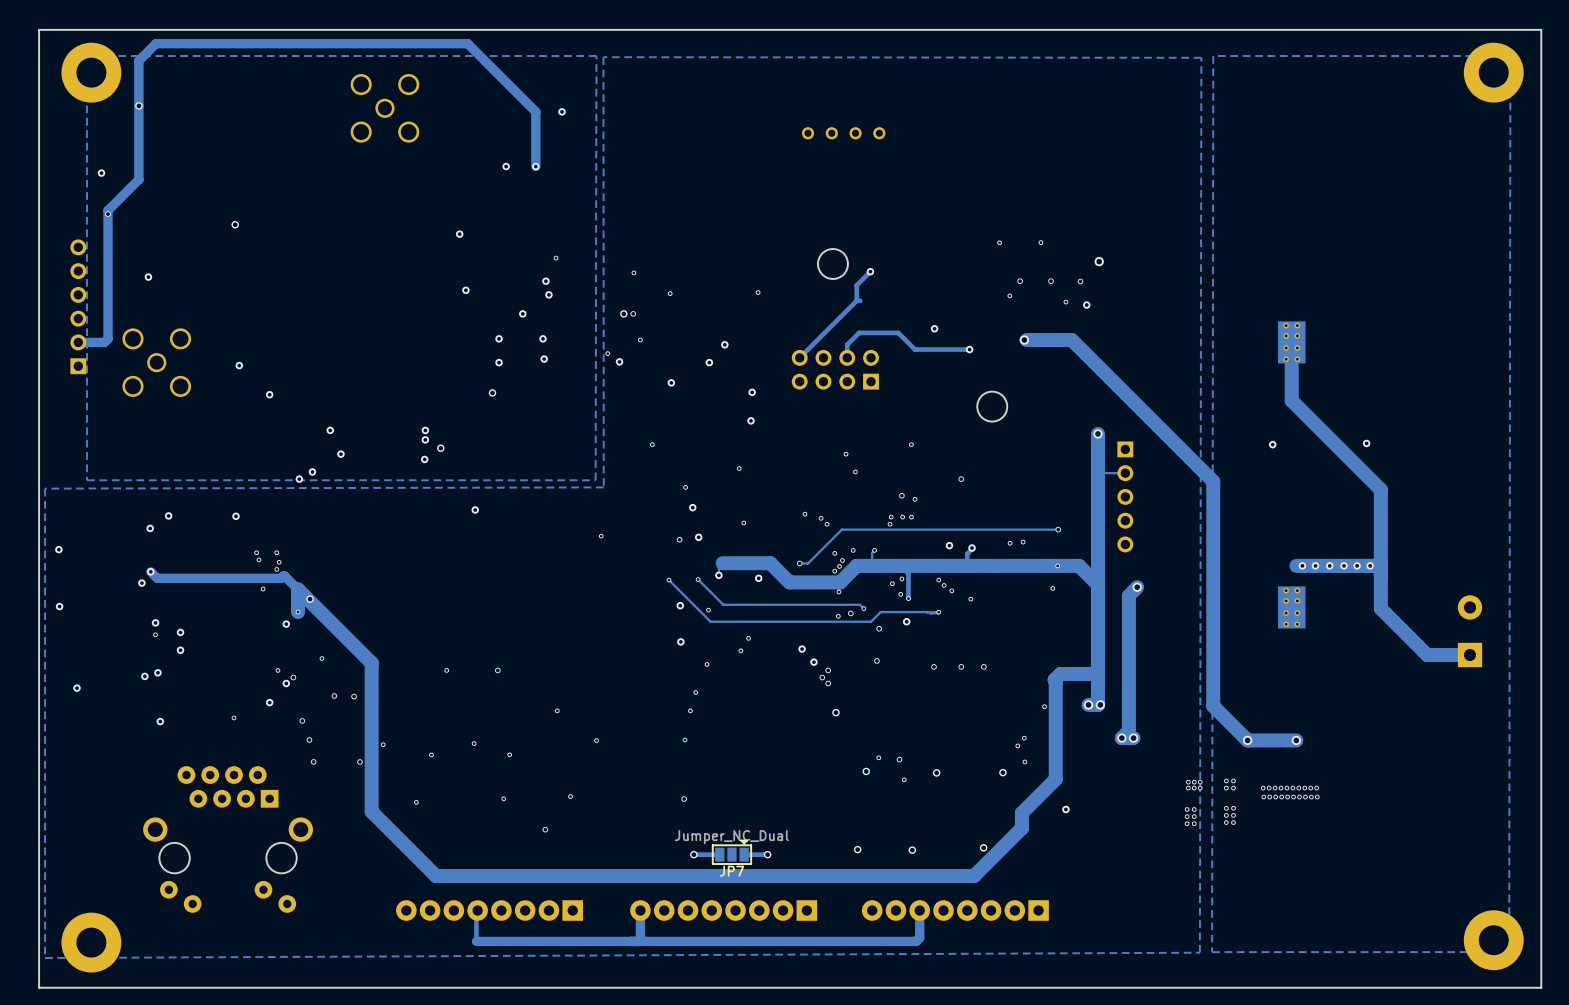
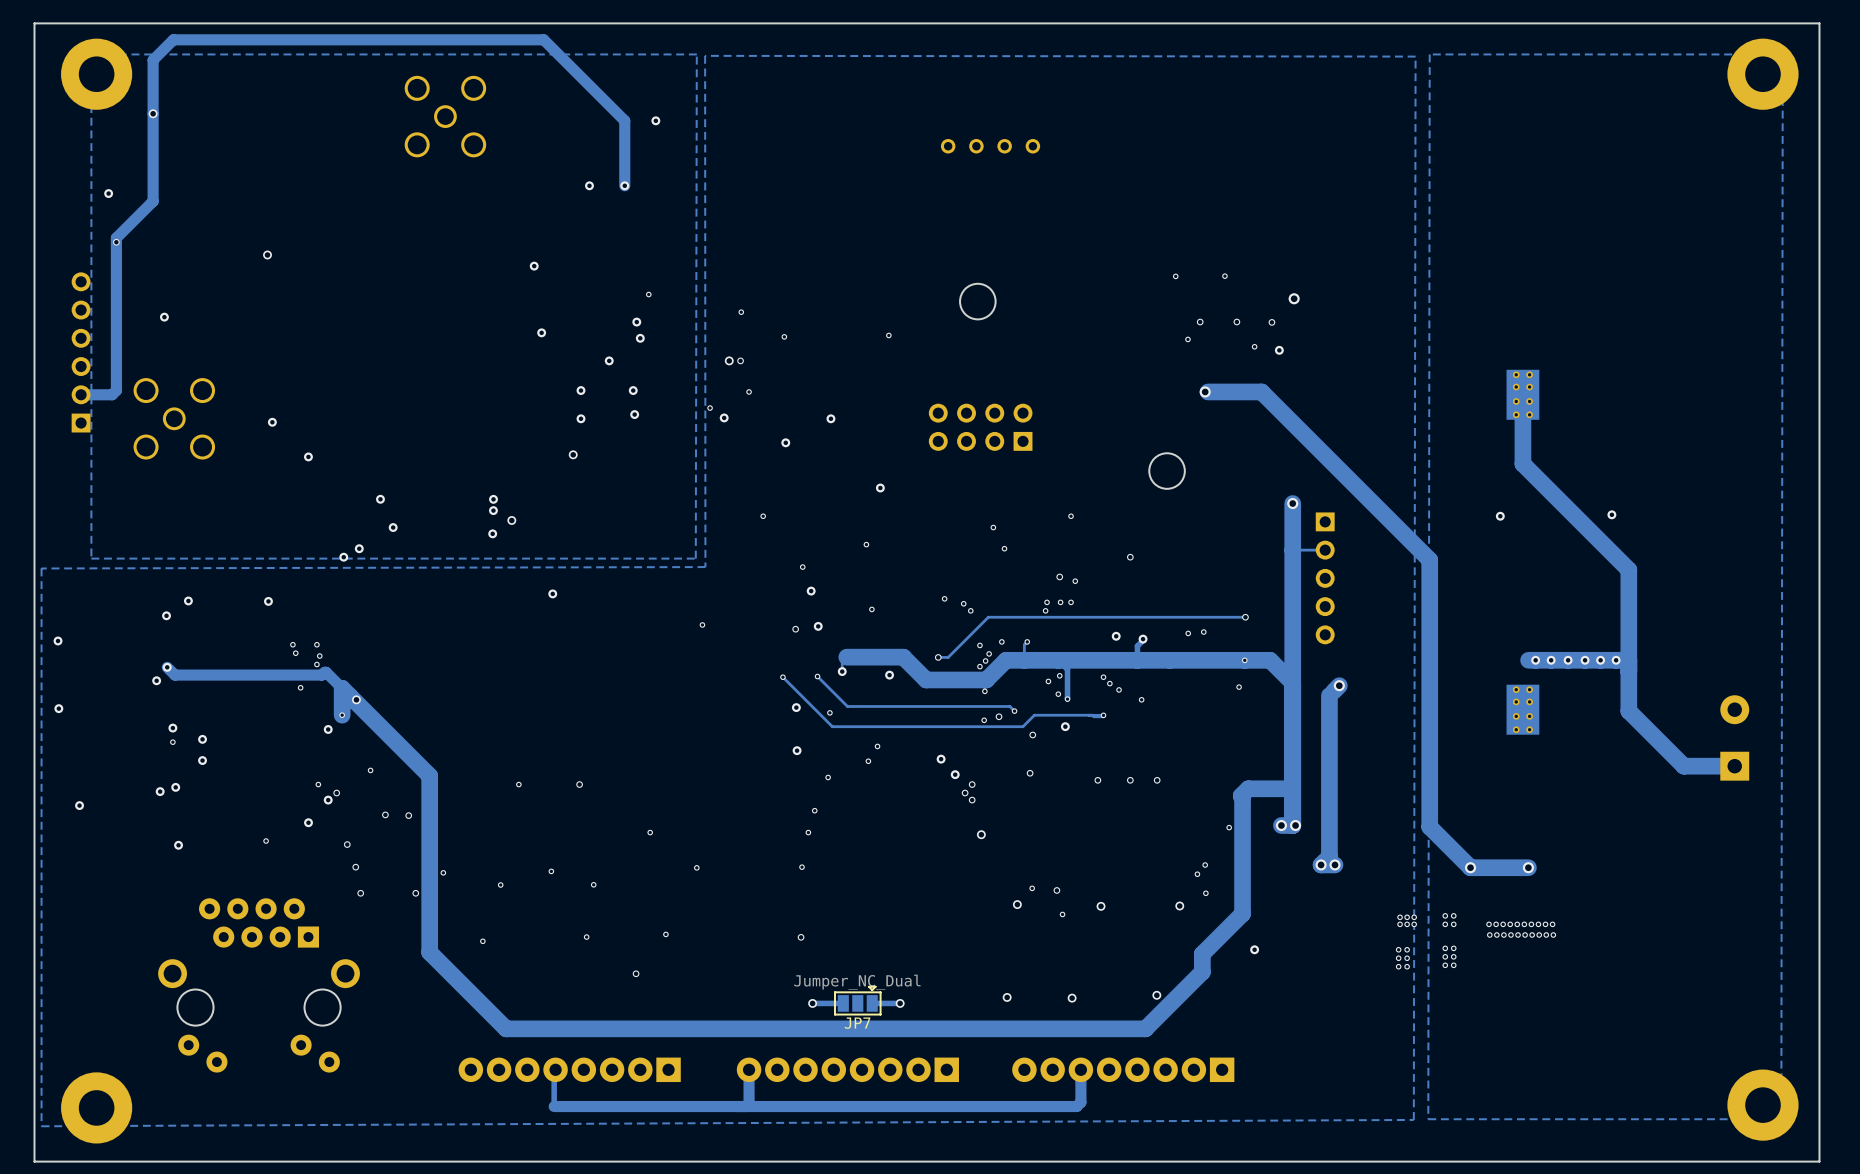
track: (870, 271) (856, 285) (856, 300) -> none
via: (870, 271) -> none
track: (856, 300) (799, 357) -> none
track: (860, 300) (856, 300) -> none
via: (934, 328) -> none
via: (724, 344) -> none
track: (969, 349) (914, 349) (898, 332) (859, 332) (847, 344) (847, 357) -> none
via: (969, 349) -> none
via: (752, 392) -> none

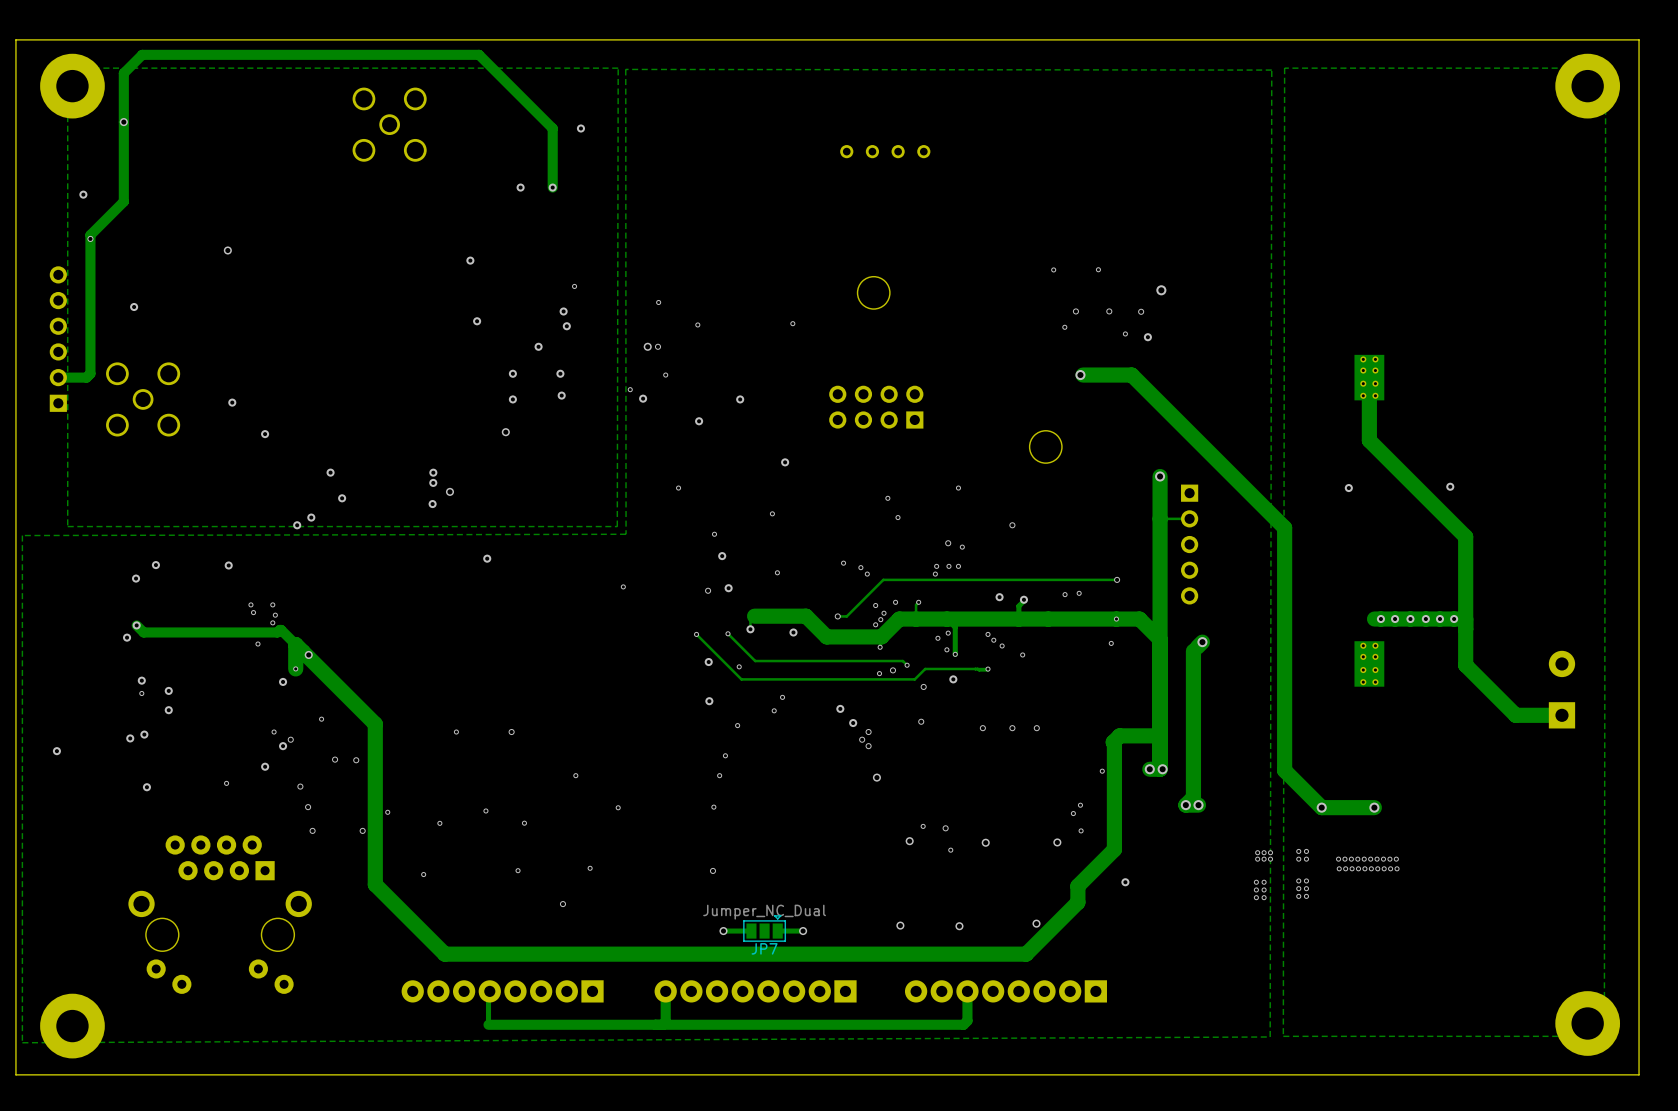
via: (58, 640) -> none
via: (58, 708) -> none

